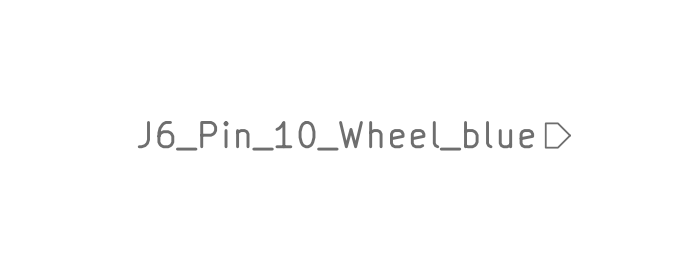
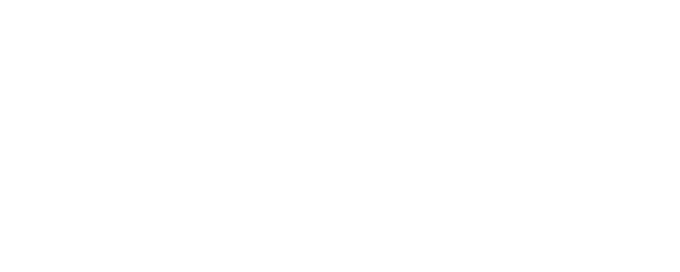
hierarchical label: J6_Pin_10_Wheel_blue (335, 135) -> none

